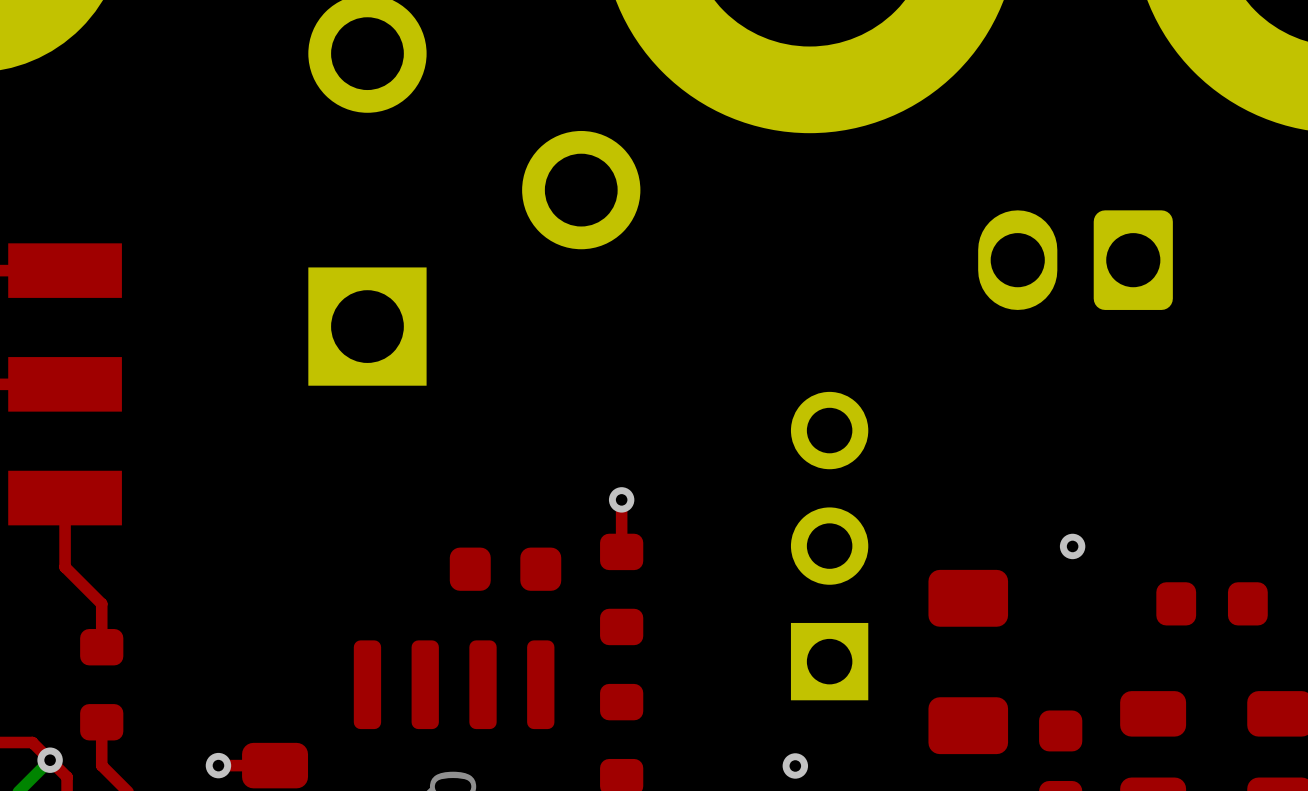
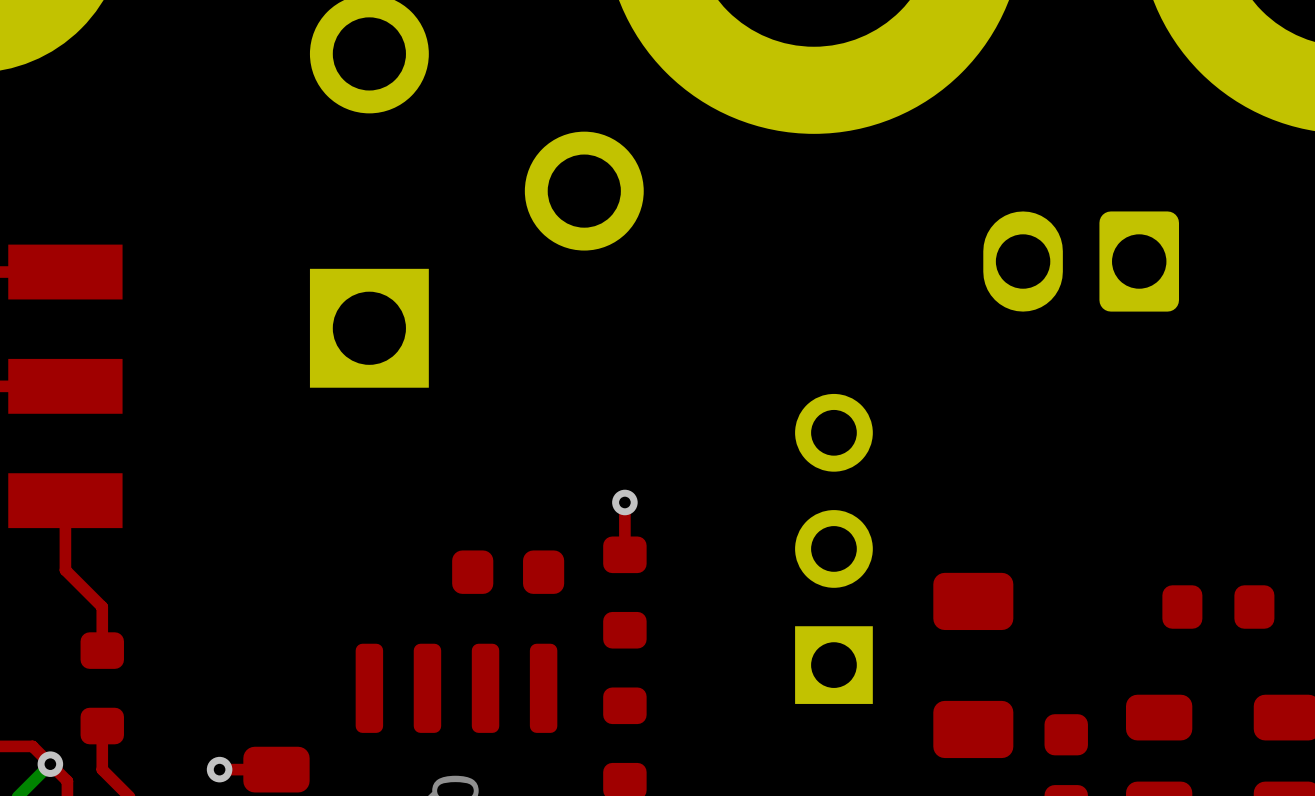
via: (1072, 546) -> none
via: (795, 765) -> none

